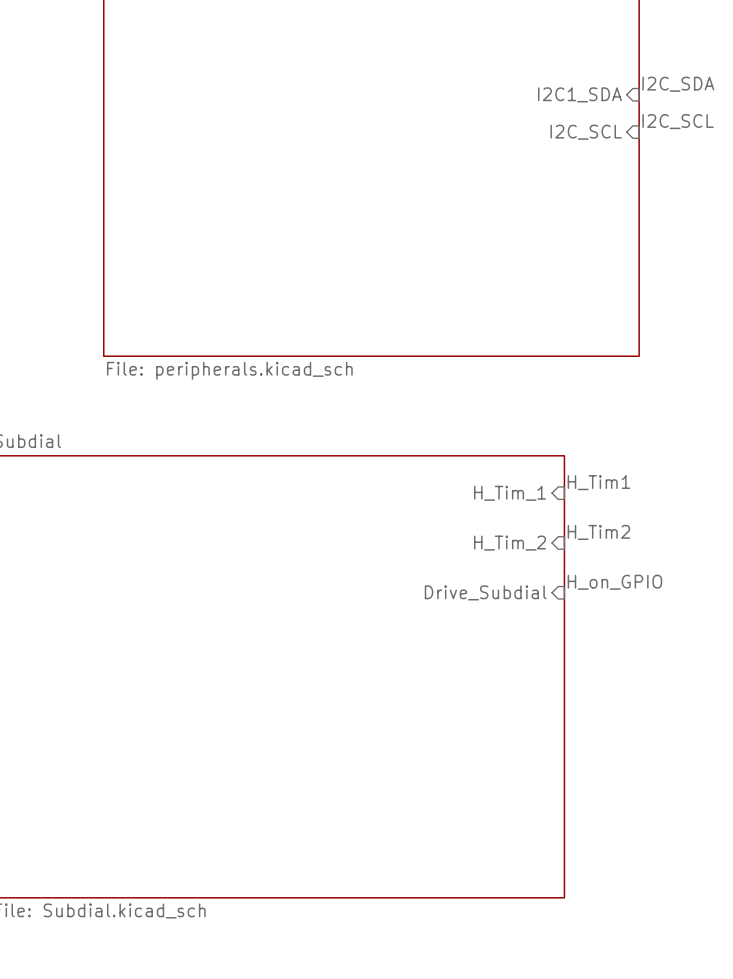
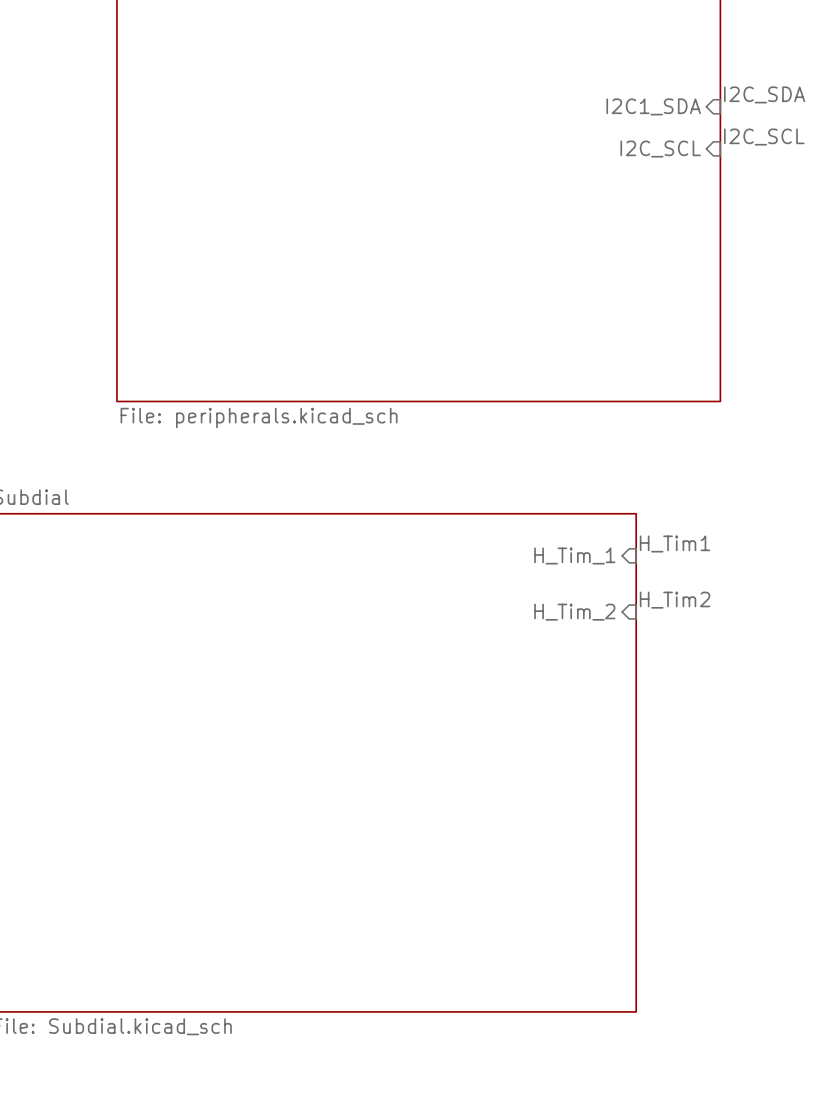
label: H_on_GPIO (614, 582) -> none
sheet pin: Drive_Subdial (485, 592) -> none

